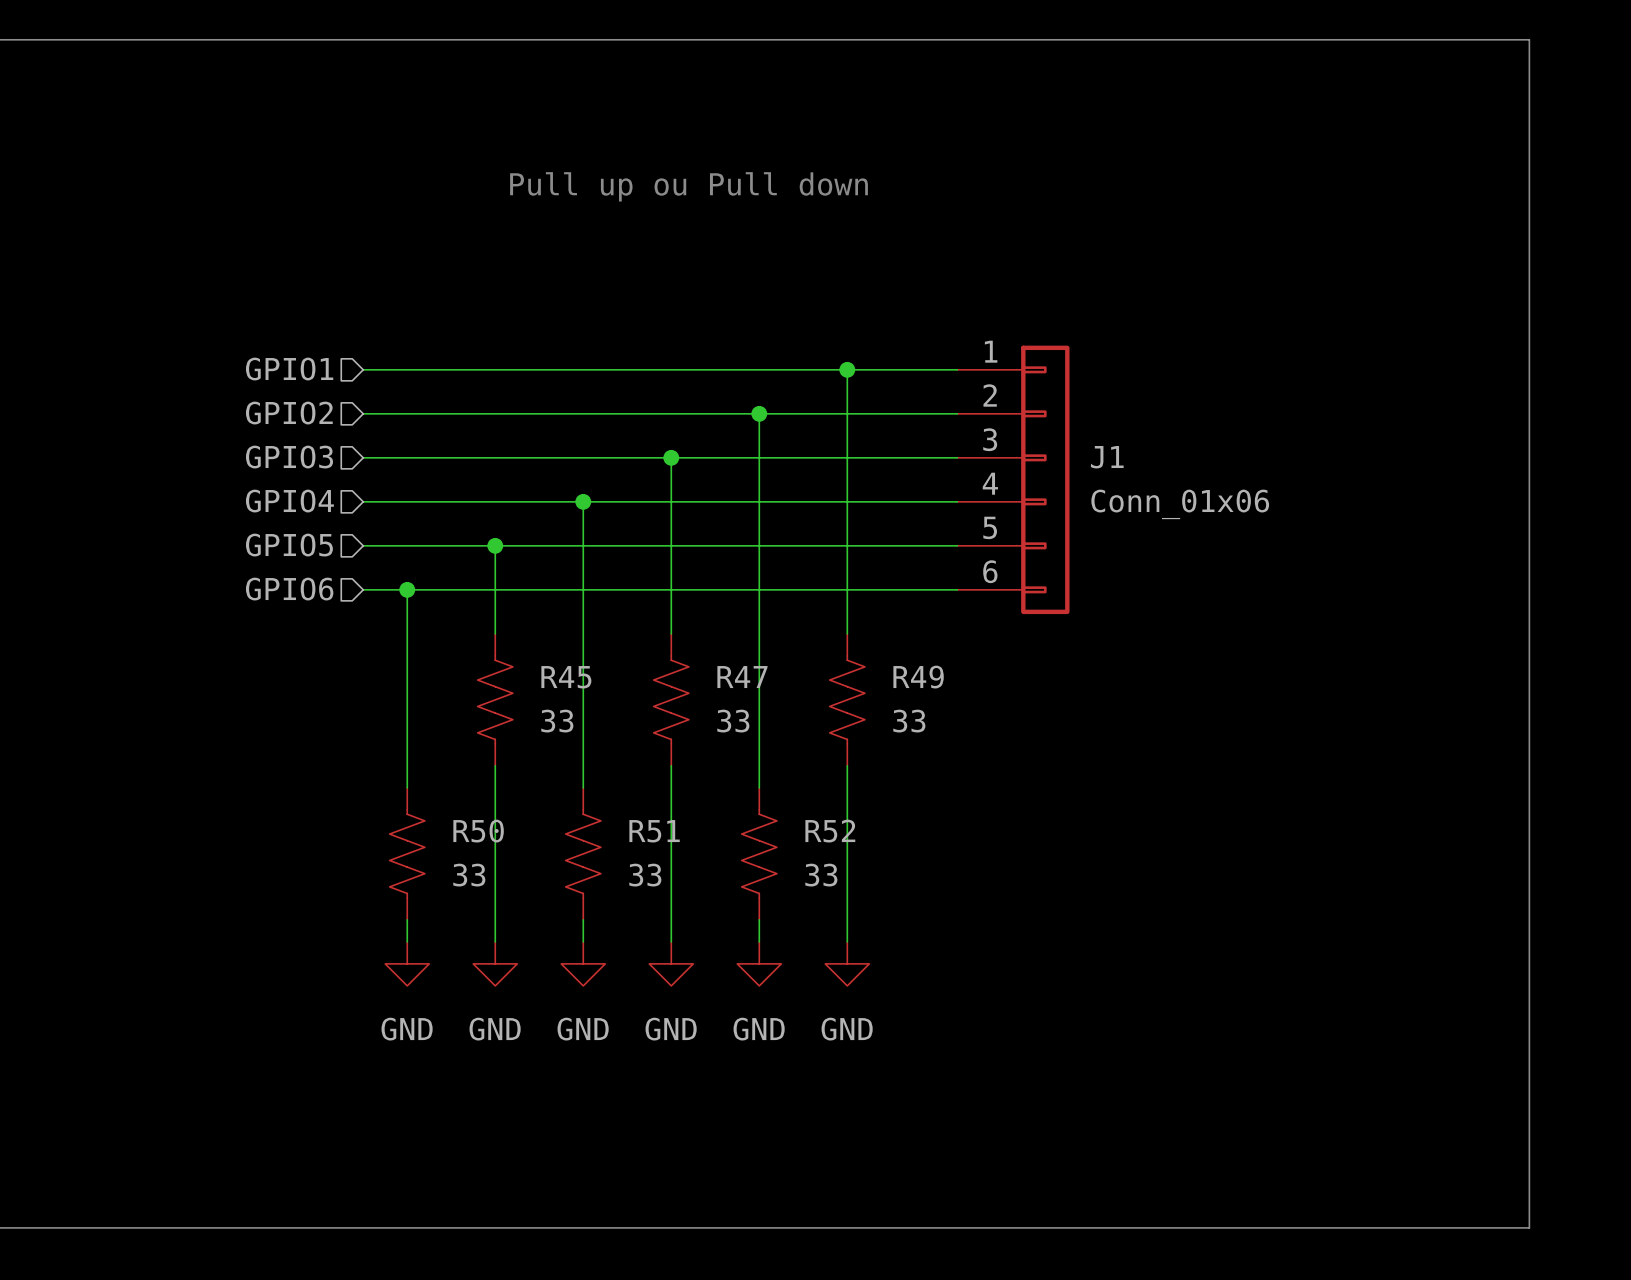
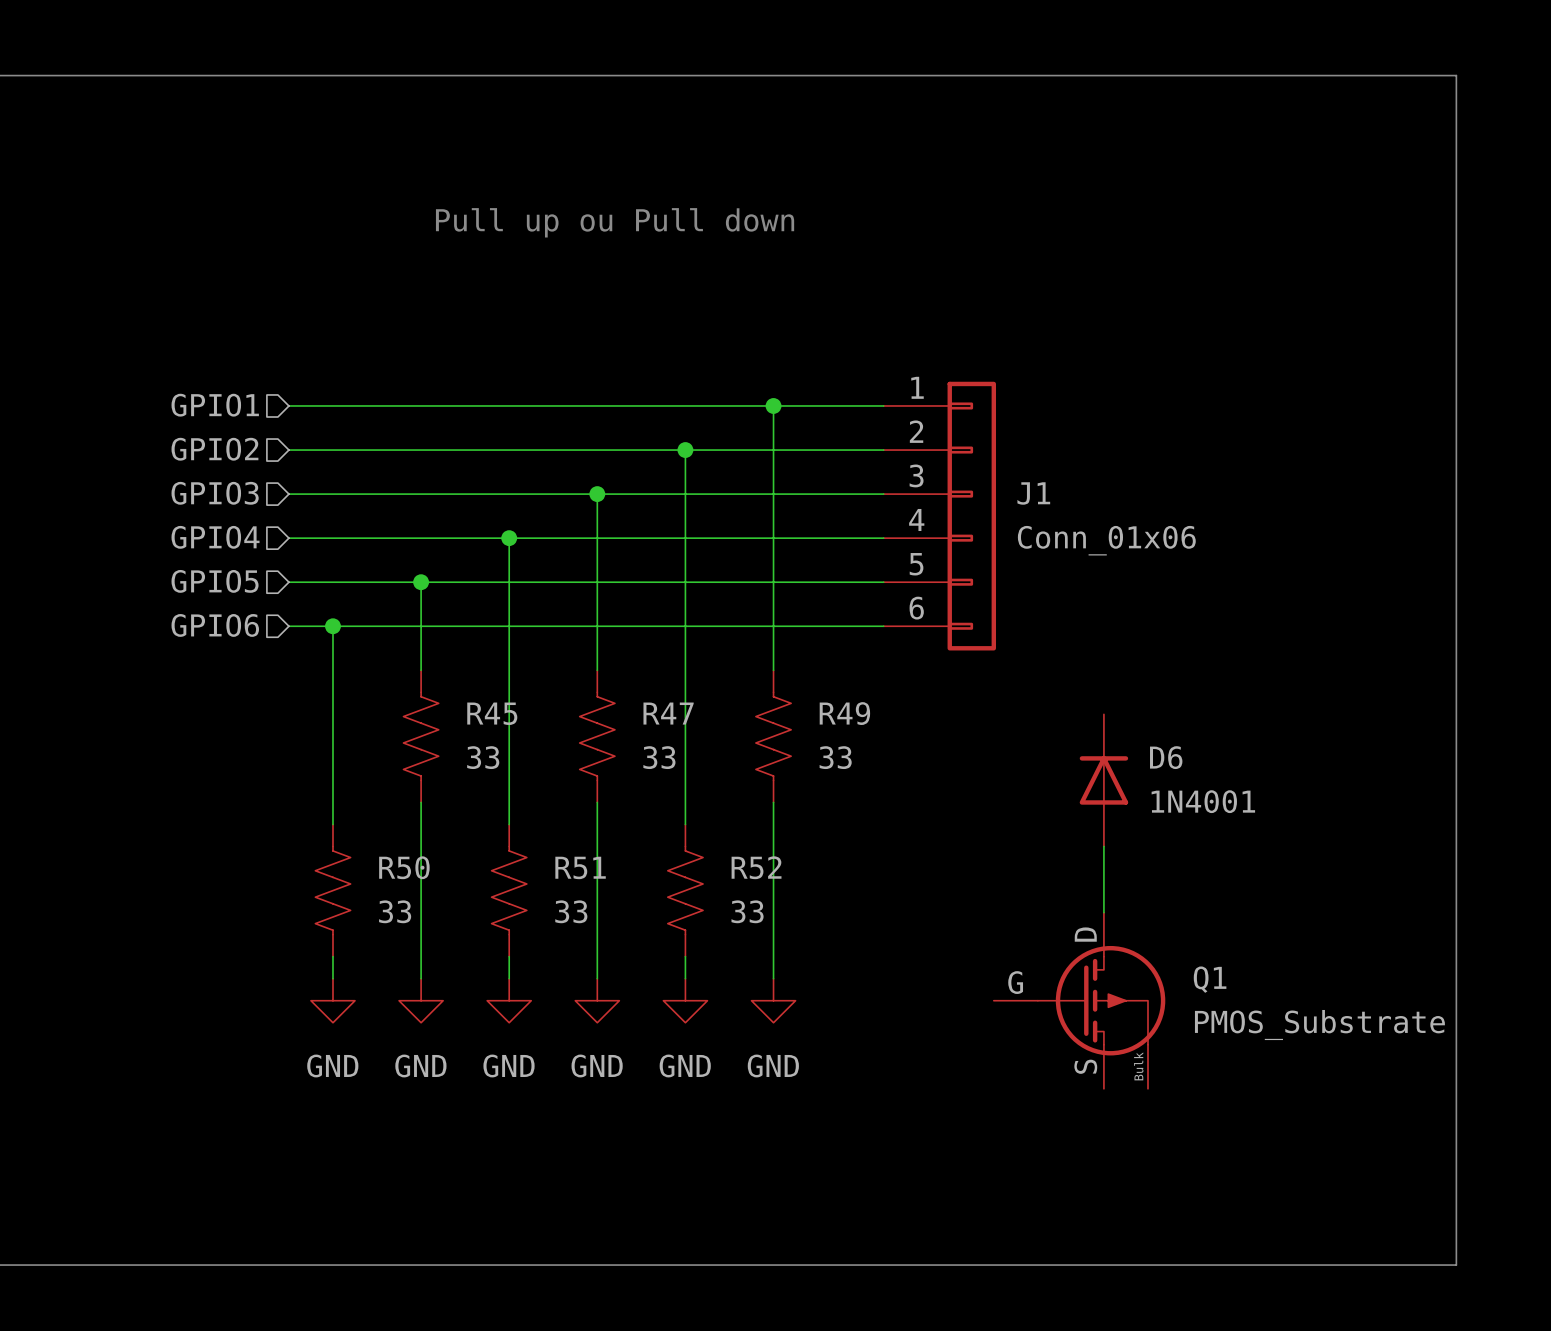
D6: none -> 1N4001 (1103, 780)
wire: none -> (1103, 846) (1103, 912)
Q1: none -> PMOS_Substrate (1079, 1000)

